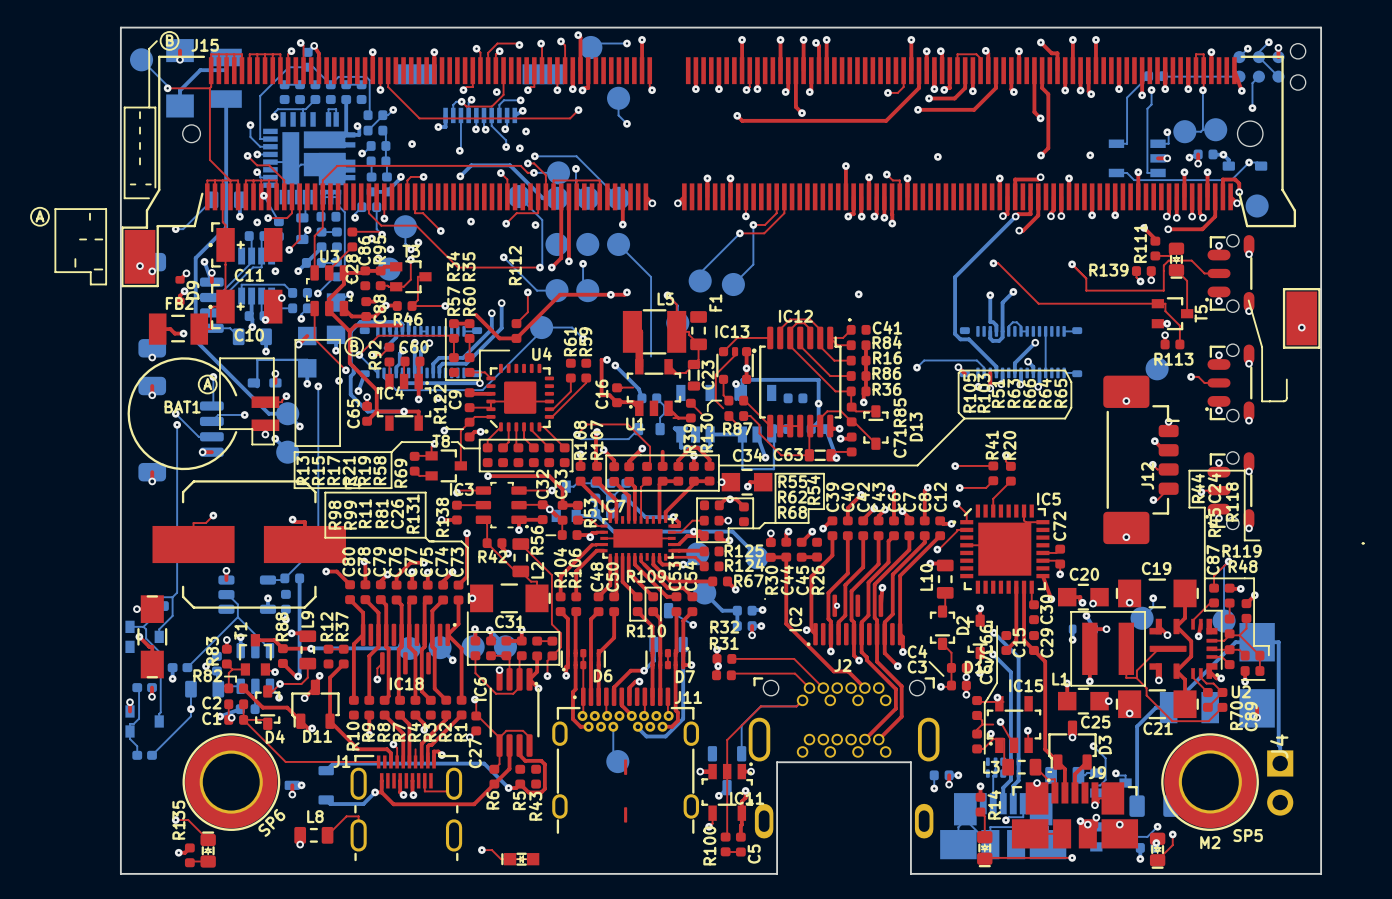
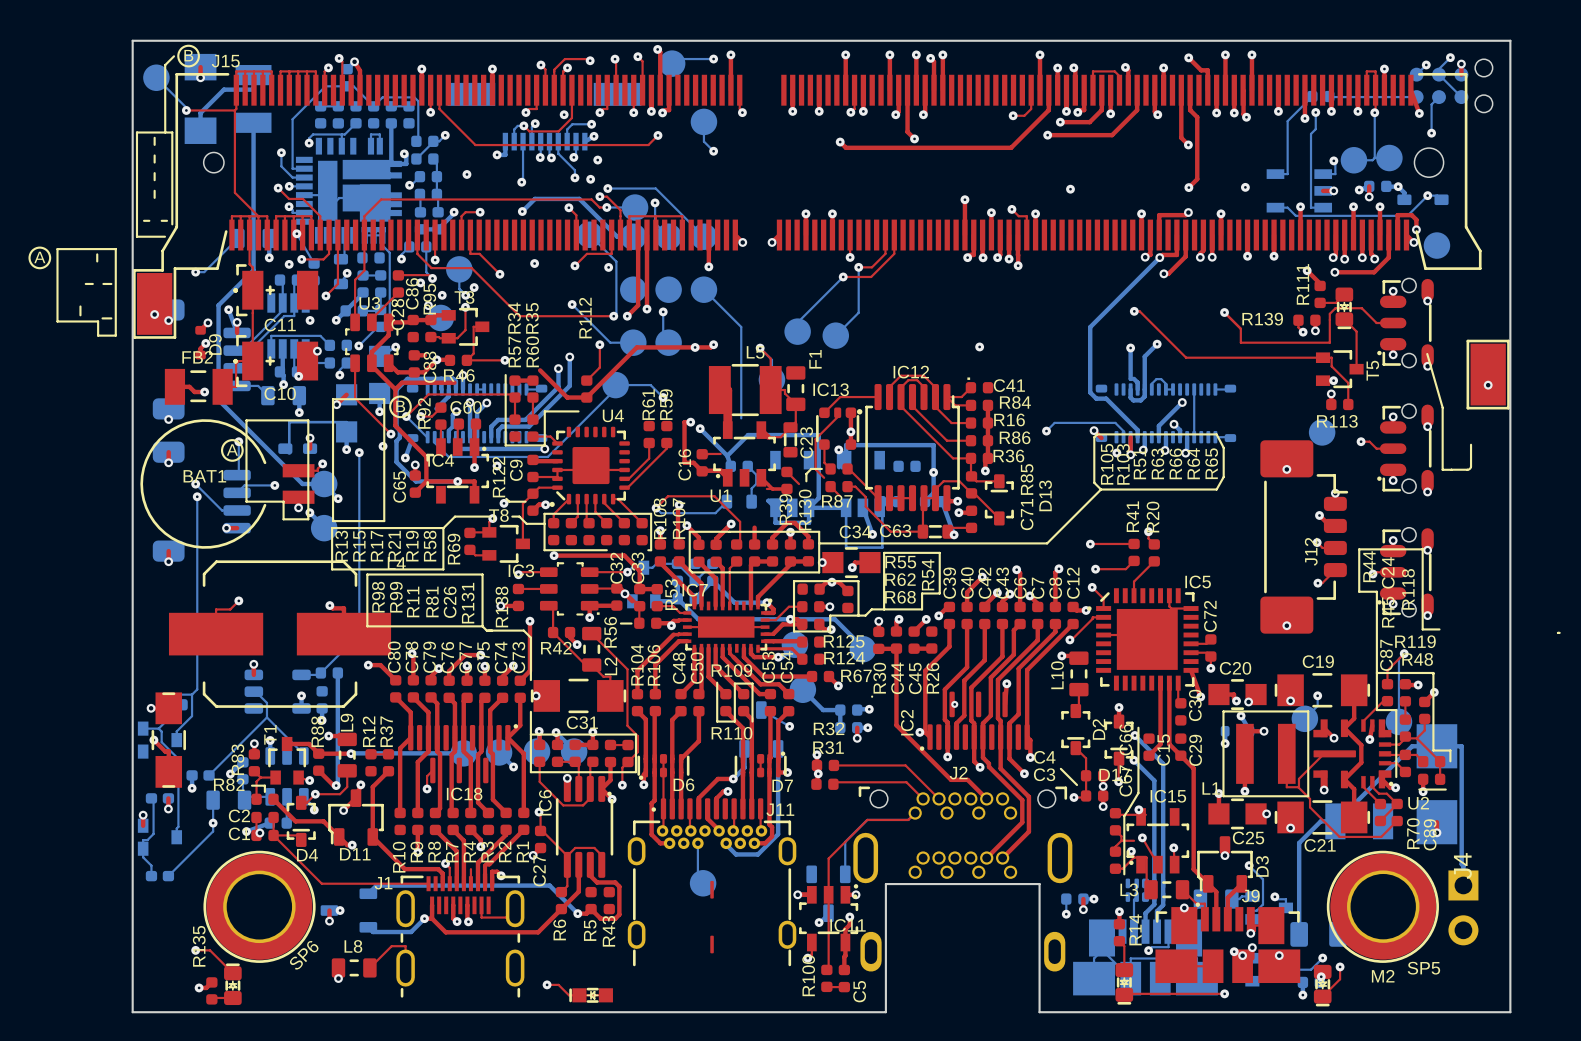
bottom track: none -> (727, 455) (748, 435) (818, 435) (818, 498) (809, 507)

